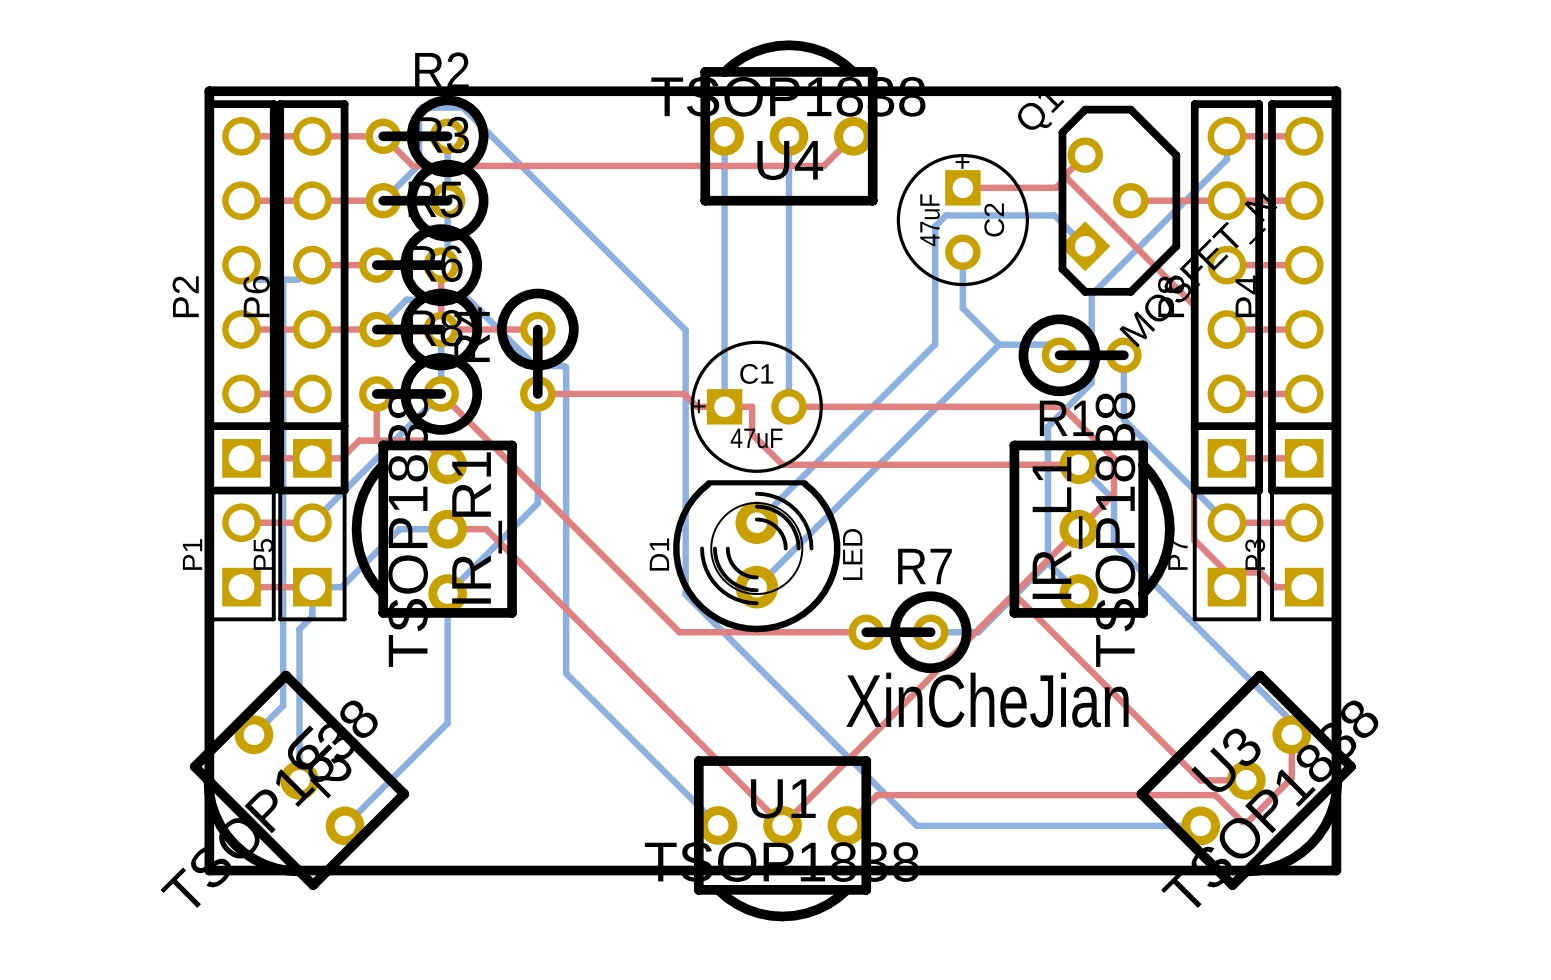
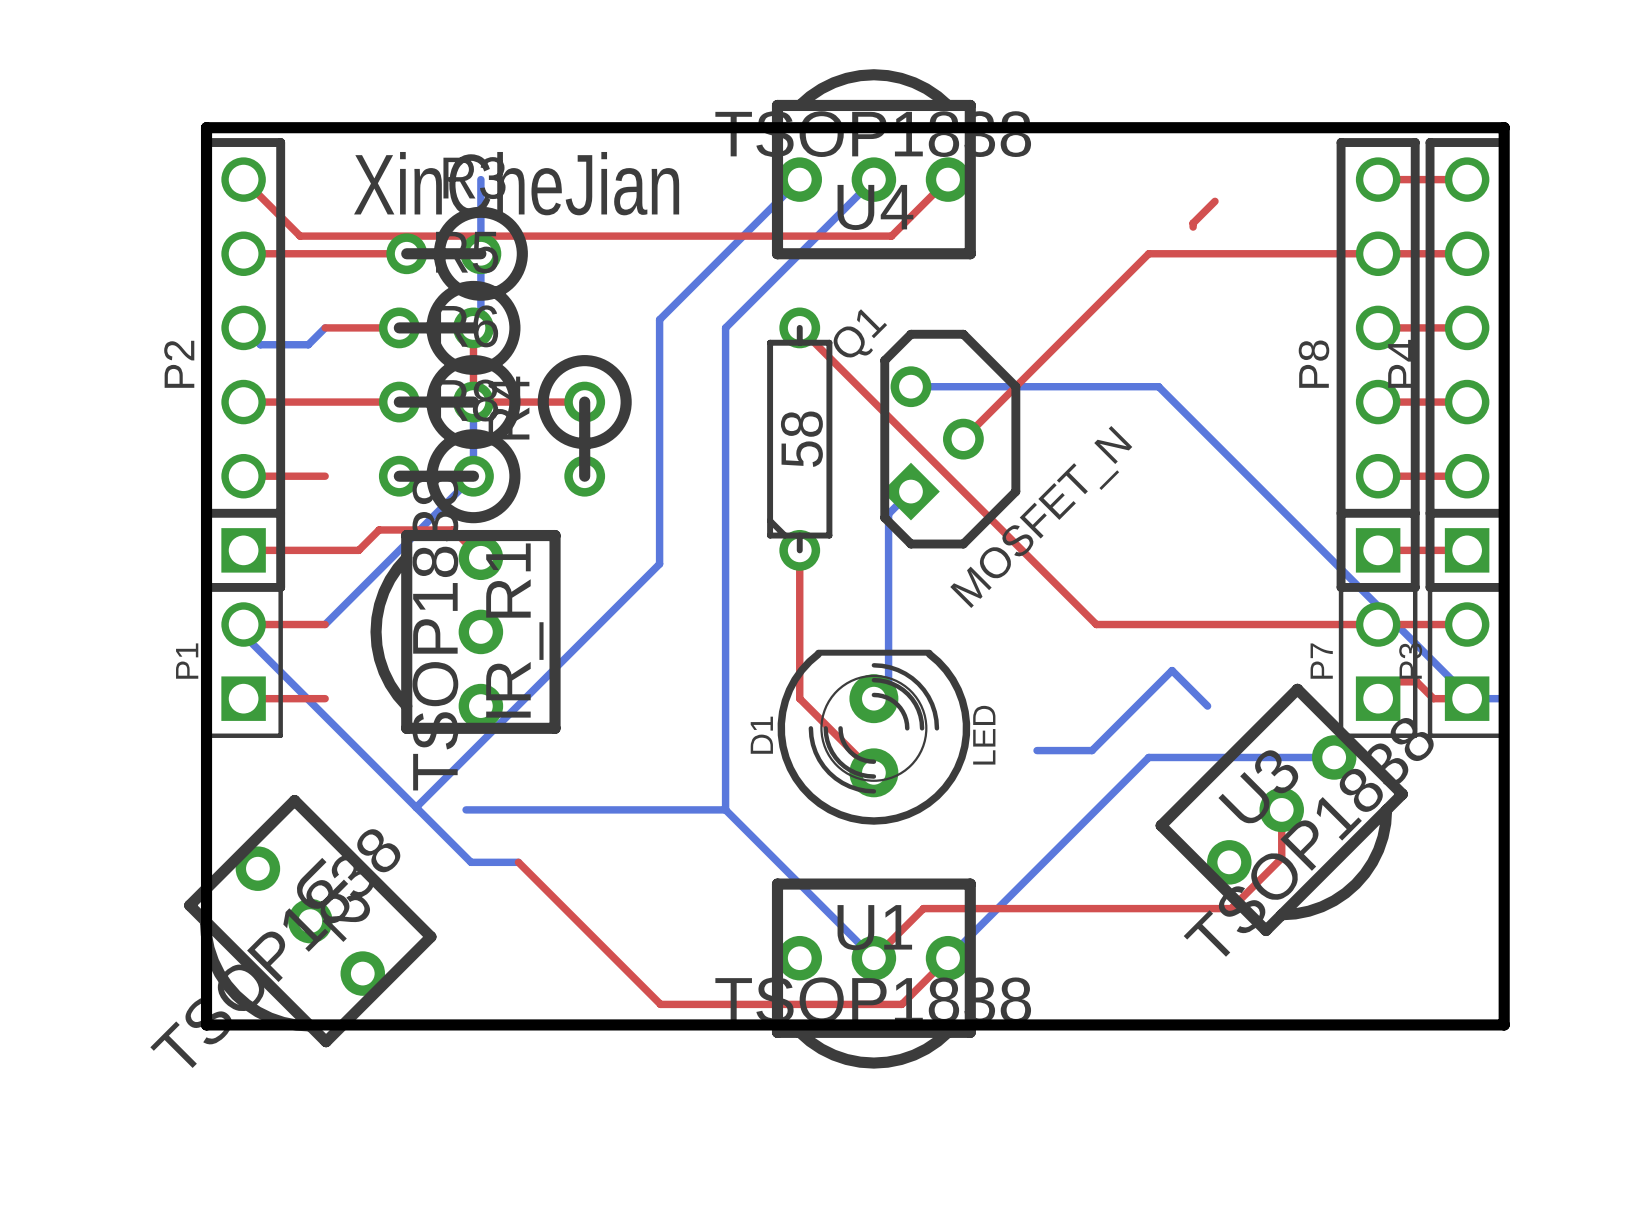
top track: (241, 136) (383, 136) (412, 165) (823, 165) -> (243, 179) (300, 236) (891, 236) (913, 213)
R2: (426, 136) -> none
bottom track: (724, 136) (724, 406) -> (799, 179) (659, 319) (659, 564) (416, 807)
bottom track: (788, 136) (788, 406) -> (873, 179) (725, 327) (725, 809)
bottom track: (1226, 136) (1226, 159) (1091, 294) (1091, 382) (1047, 426) (1047, 562) -> none
text: none -> XinCheJian (516, 183)
top track: (962, 187) (1055, 187) (1066, 177) (1194, 305) (1194, 539) (1226, 572) (1226, 587) -> none
bottom track: (383, 200) (419, 164) (419, 110) (421, 107) (463, 107) (685, 330) (685, 594) (916, 825) (1200, 825) -> none
Q1 position: (1119, 200) -> (950, 439)
top track: none -> (1267, 253) (1148, 253) (963, 439)
C2: 47uF (962, 220) -> none
bottom track: (1085, 246) (1054, 215) (946, 215) (935, 226) (935, 344) (756, 522) -> none
bottom track: (962, 252) (962, 308) (999, 344) -> none
top track: none -> (799, 327) (1096, 624) (1378, 624)
bottom track: (283, 279) (283, 705) (253, 734) -> none
P6: (312, 297) -> none
bottom track: none -> (910, 386) (1158, 386) (1470, 698) (1504, 698)
bottom track: (376, 329) (406, 299) (468, 299) (535, 366) (564, 366) (566, 367) (566, 673) (718, 825) -> none
bottom track: (999, 344) (1048, 344) (1059, 355) -> none
bottom track: (999, 344) (756, 587) -> none
R1: (1080, 355) -> none
bottom track: (1123, 355) (1123, 419) (1226, 522) -> none
part: none -> 58 (799, 439)
top track: (376, 393) (376, 440) -> none
top track: (441, 393) (679, 632) (866, 632) -> none
bottom track: (537, 393) (537, 503) (447, 593) (447, 723) (345, 825) -> none
top track: (537, 393) (684, 393) (697, 406) (752, 406) (752, 434) (782, 464) (1078, 464) -> none
C1: 47uF (756, 406) -> none
top track: (788, 406) (1062, 406) (1113, 458) (1113, 494) (782, 825) (486, 529) (447, 529) -> none
bottom track: none -> (910, 491) (888, 513) (888, 683) (873, 698)
top track: none -> (799, 550) (799, 698) (873, 772)
bottom track: (1078, 464) (1113, 499) (1113, 543) (1291, 721) (1291, 734) -> none
bottom track: none -> (243, 624) (243, 634) (471, 862) (518, 862)
bottom track: (447, 529) (399, 529) (341, 587) (312, 587) (312, 616) (299, 629) (299, 780) -> none
IR_L1: TSOP1838 (1092, 529) -> none
P5: (312, 554) -> none
D1 position: (756, 556) -> (873, 737)
top track: (1014, 593) (1200, 780) (1246, 780) -> none
R7: (910, 632) -> none
bottom track: none -> (1334, 757) (1148, 757) (948, 958)
bottom track: none -> (466, 809) (725, 809)
bottom track: none -> (725, 809) (873, 958)
top track: none -> (1281, 809) (1281, 858) (1231, 908) (923, 908) (873, 958)
text: XinCheJian (987, 700) -> none
top track: none -> (518, 862) (660, 1004) (901, 1004) (948, 958)
top track: (1291, 734) (1291, 778) (1248, 821) (1241, 821) (1215, 795) (877, 795) (846, 825) -> none
U3 position: (1246, 780) -> (1281, 809)
U1 position: (782, 838) -> (873, 973)

